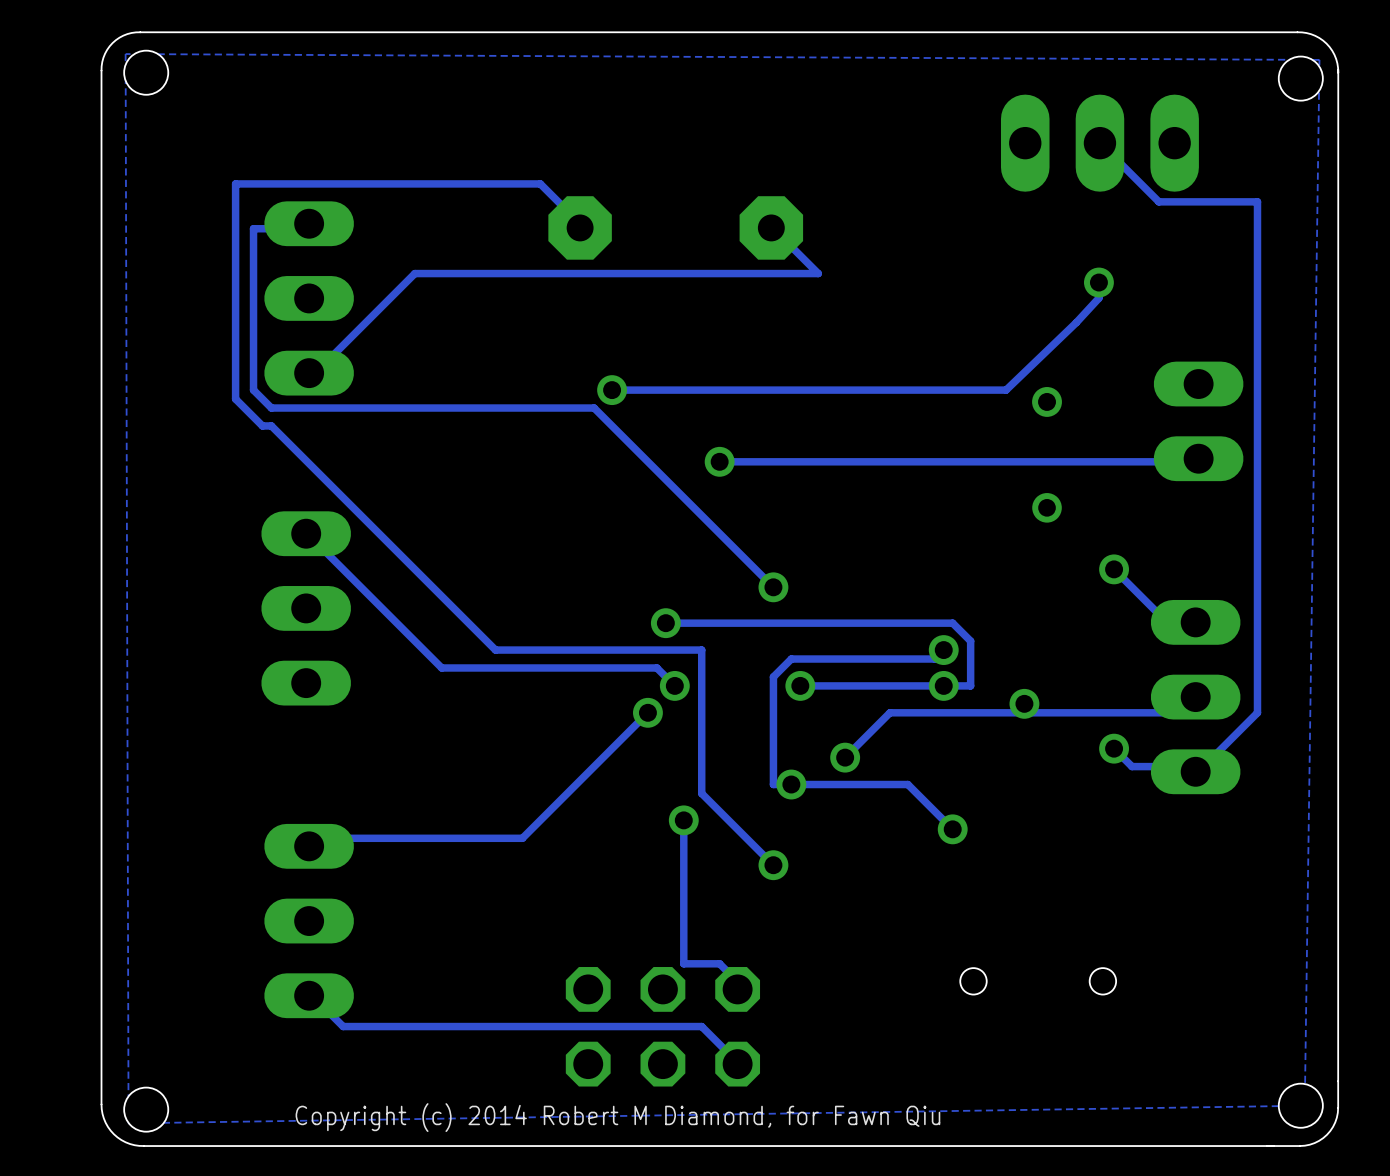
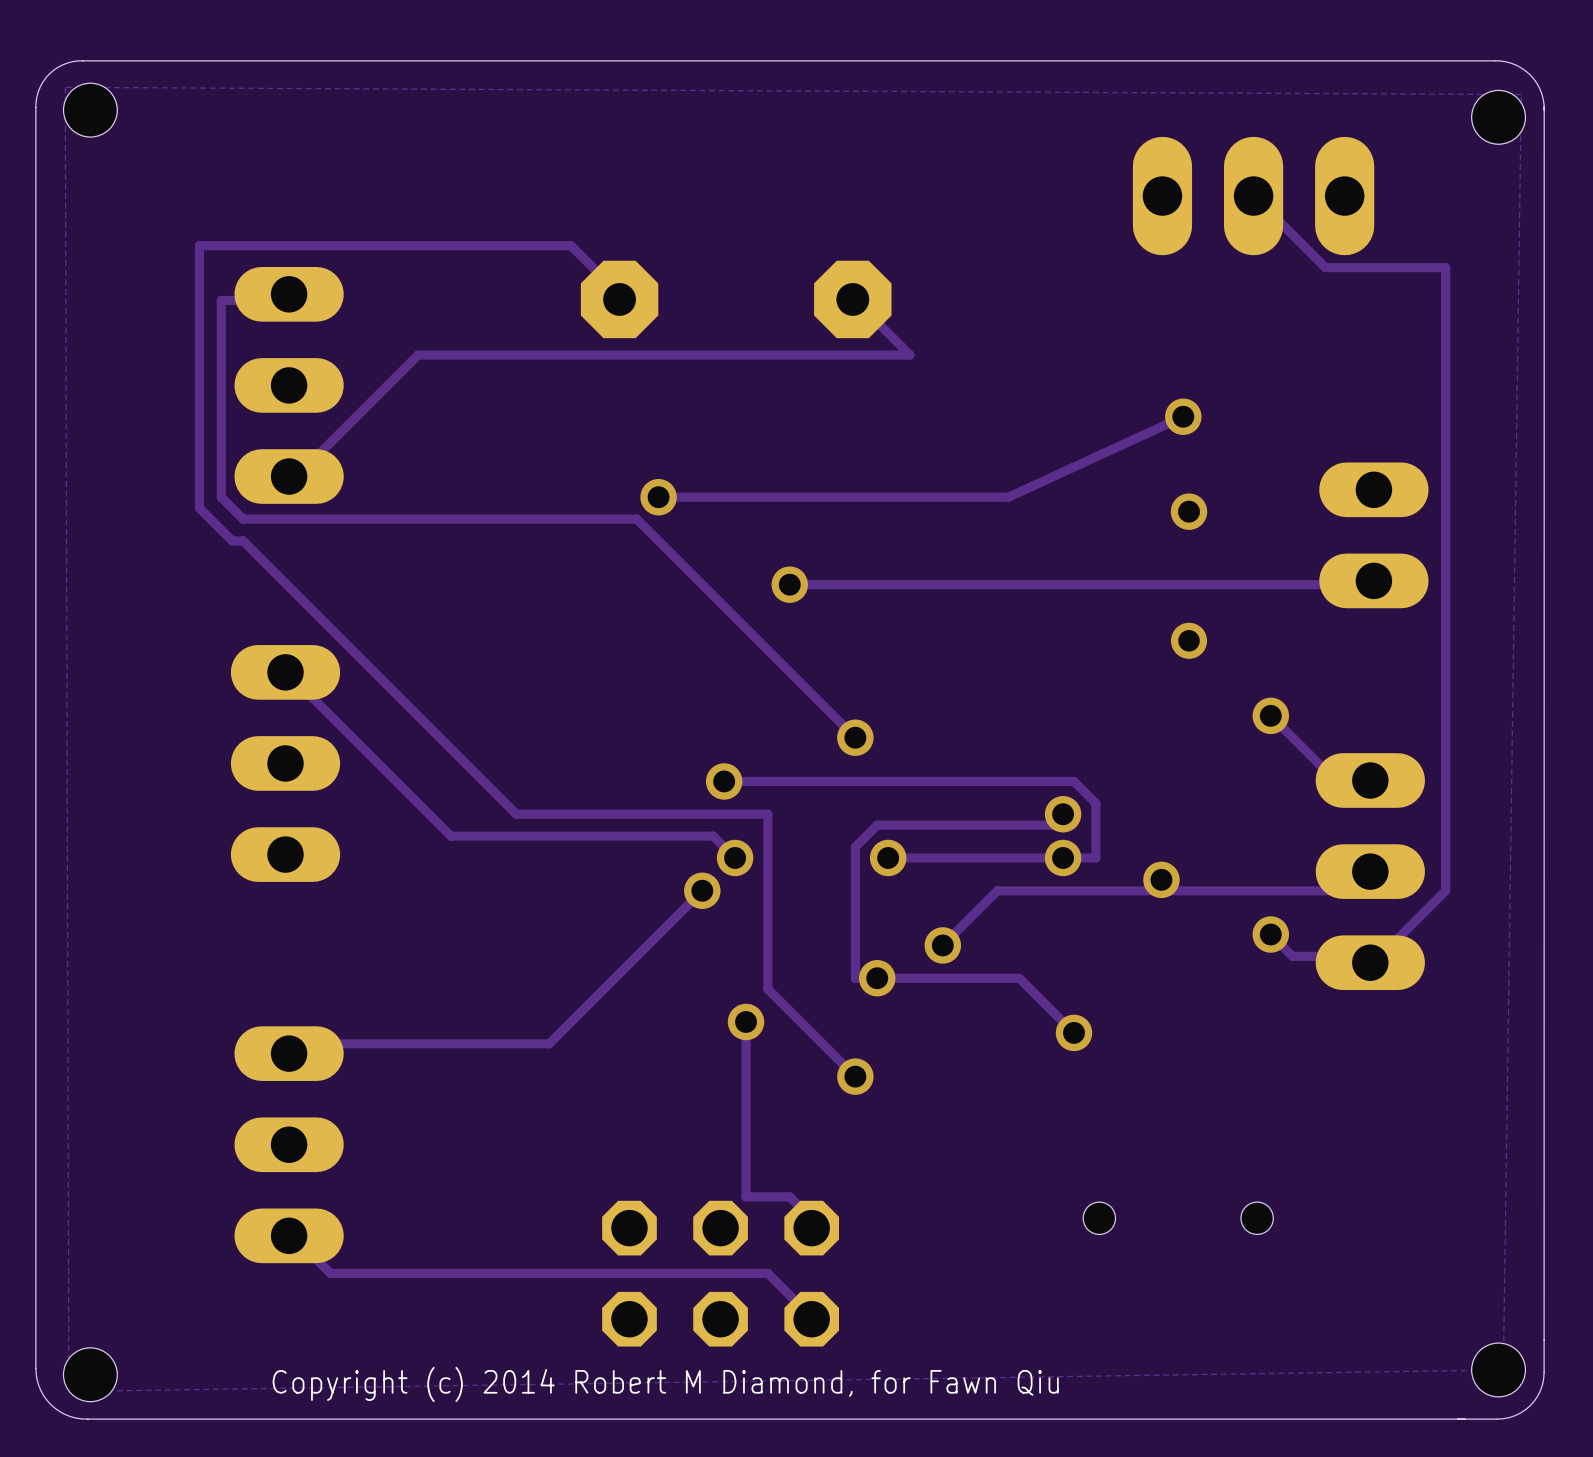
track: (1098, 282) (1098, 298) (1006, 390) (898, 390) -> (1183, 416) (1008, 497)
via position: (1098, 282) -> (1183, 416)

